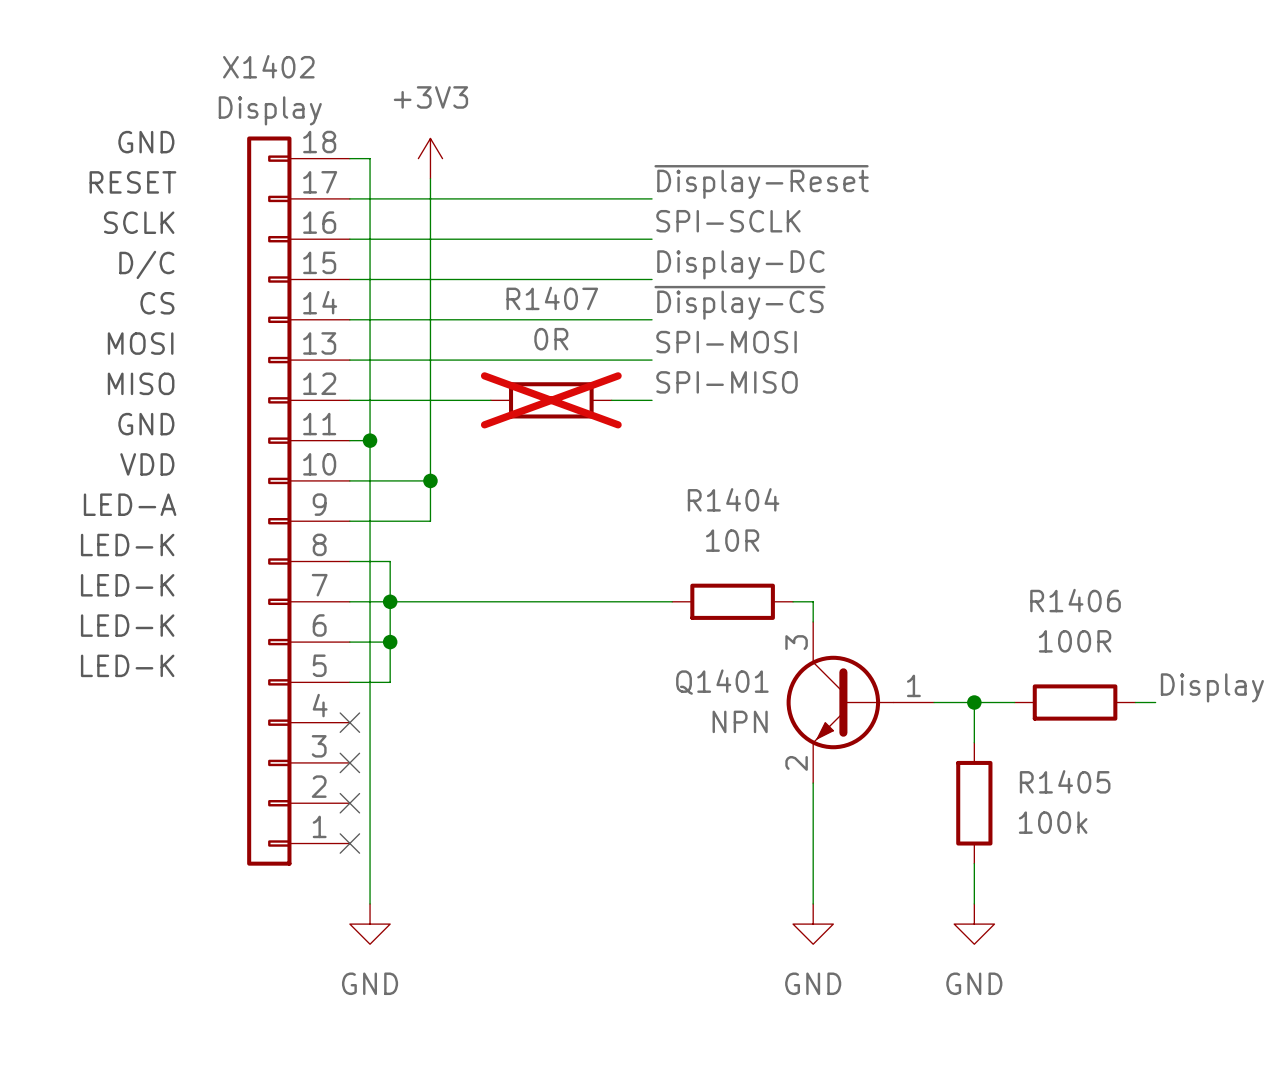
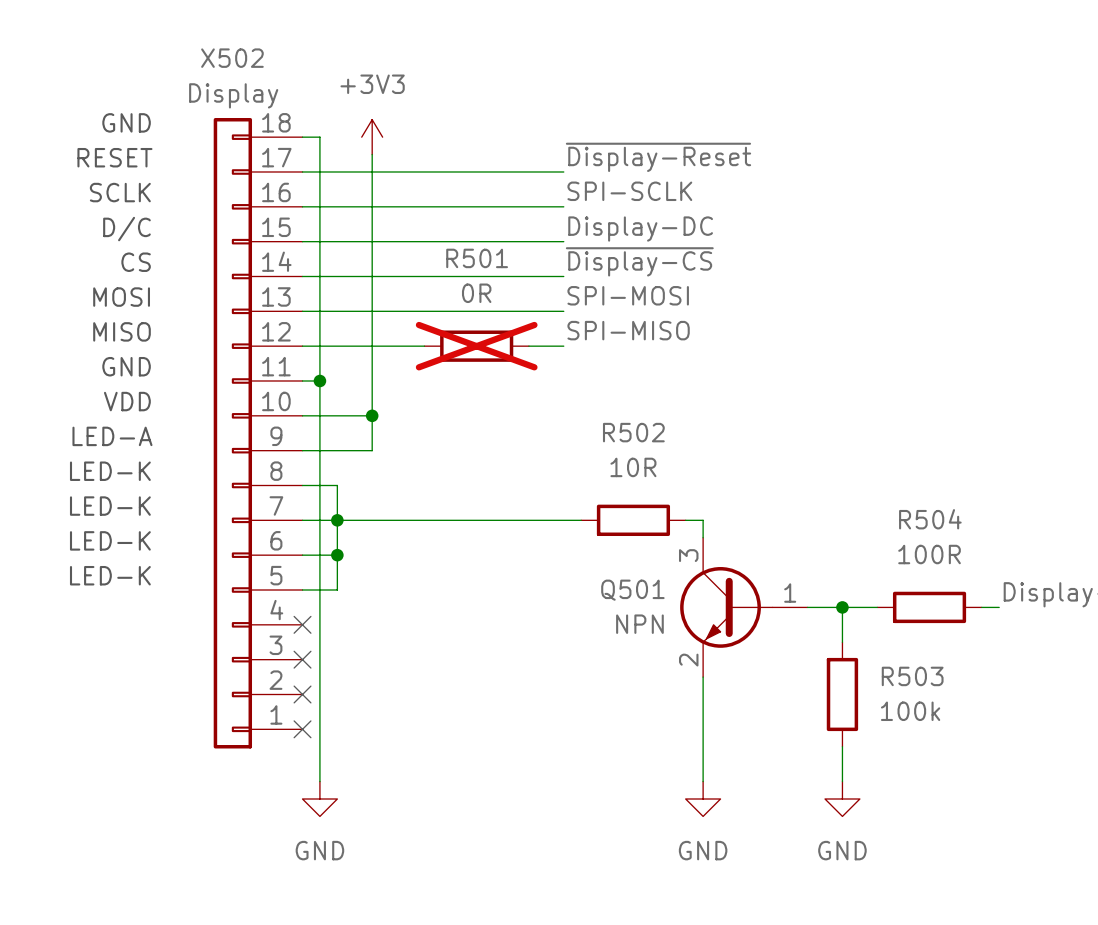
X1402 name: X1402 (268, 66) -> X502 (232, 58)
R1407 name: R1407 (552, 298) -> R501 (477, 258)
R1404 name: R1404 (733, 499) -> R502 (633, 432)
R1406 name: R1406 (1075, 600) -> R504 (930, 519)
Q1401 name: Q1401 (722, 682) -> Q501 (632, 590)
R1405 name: R1405 (1065, 781) -> R503 (912, 676)

